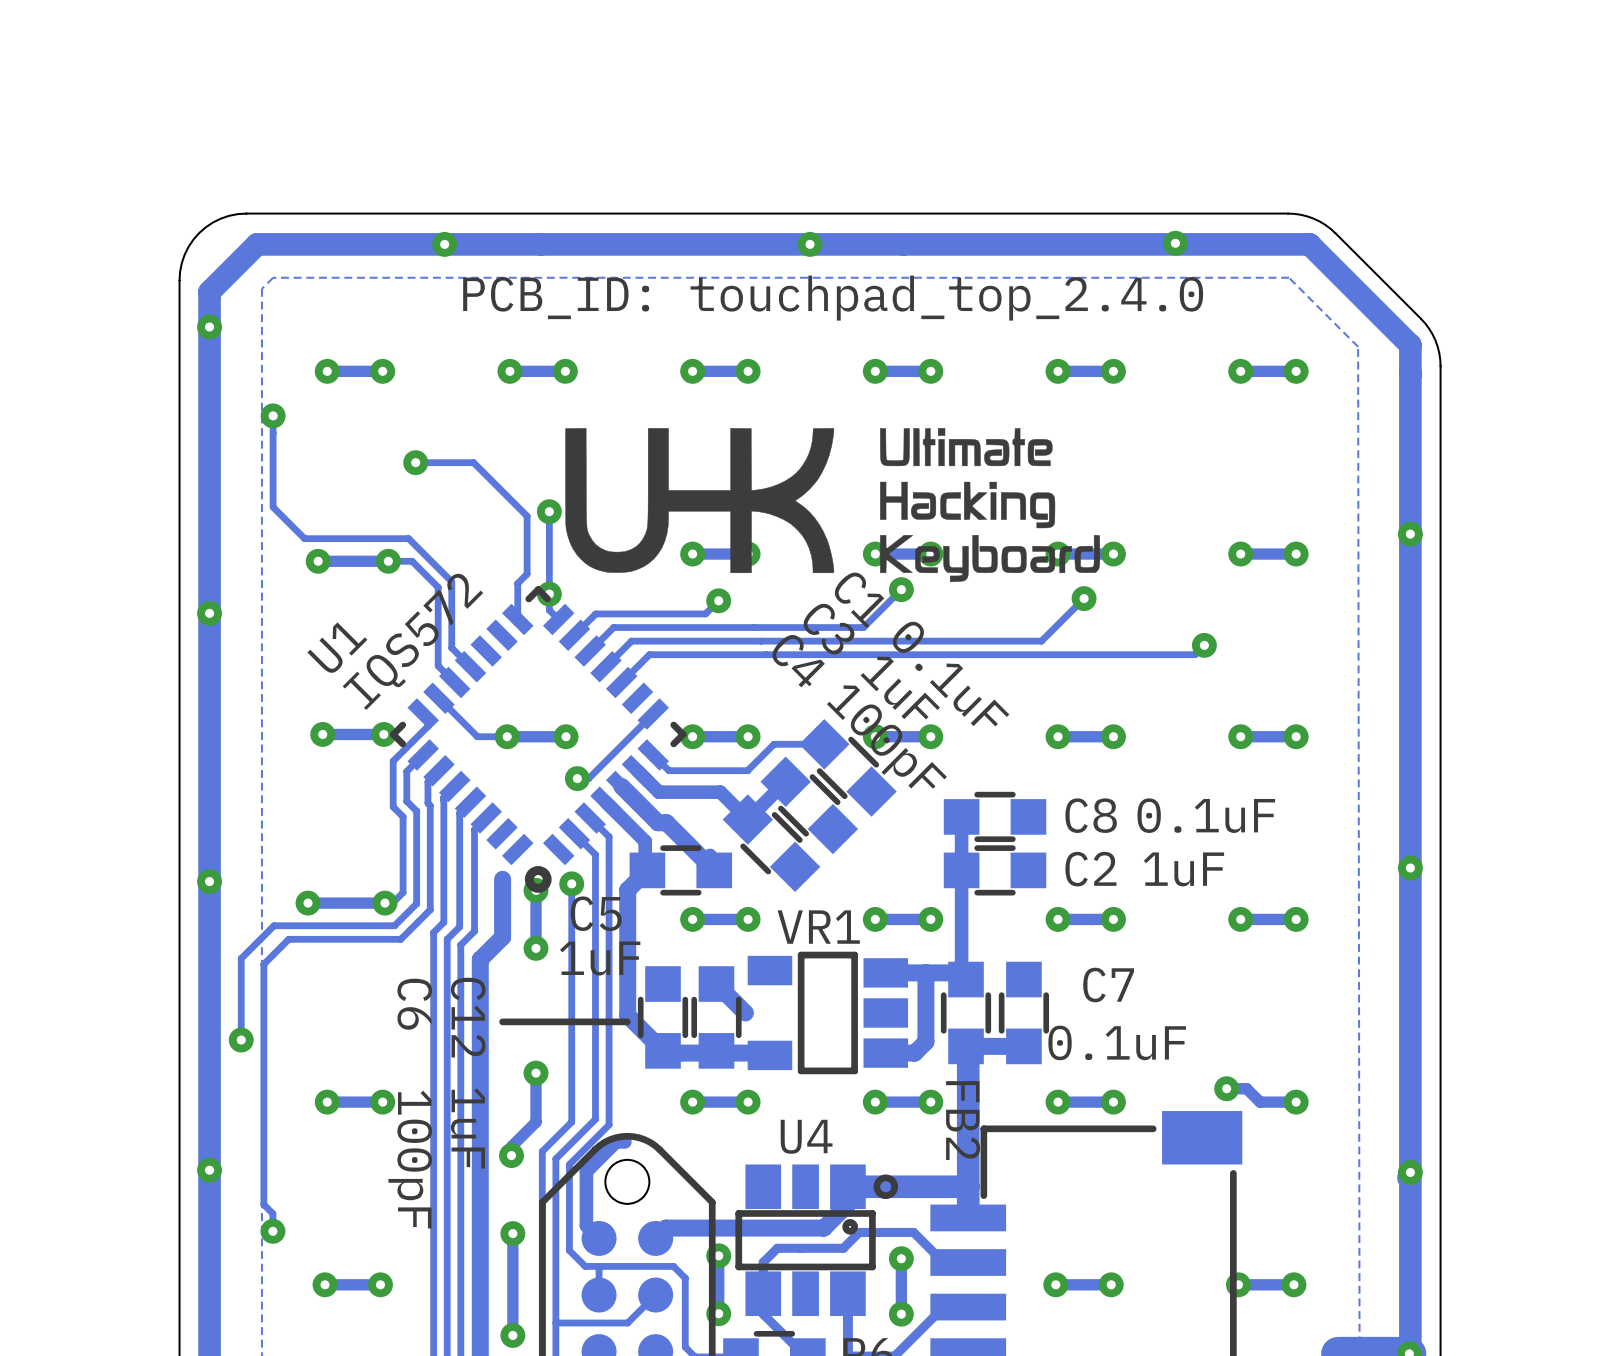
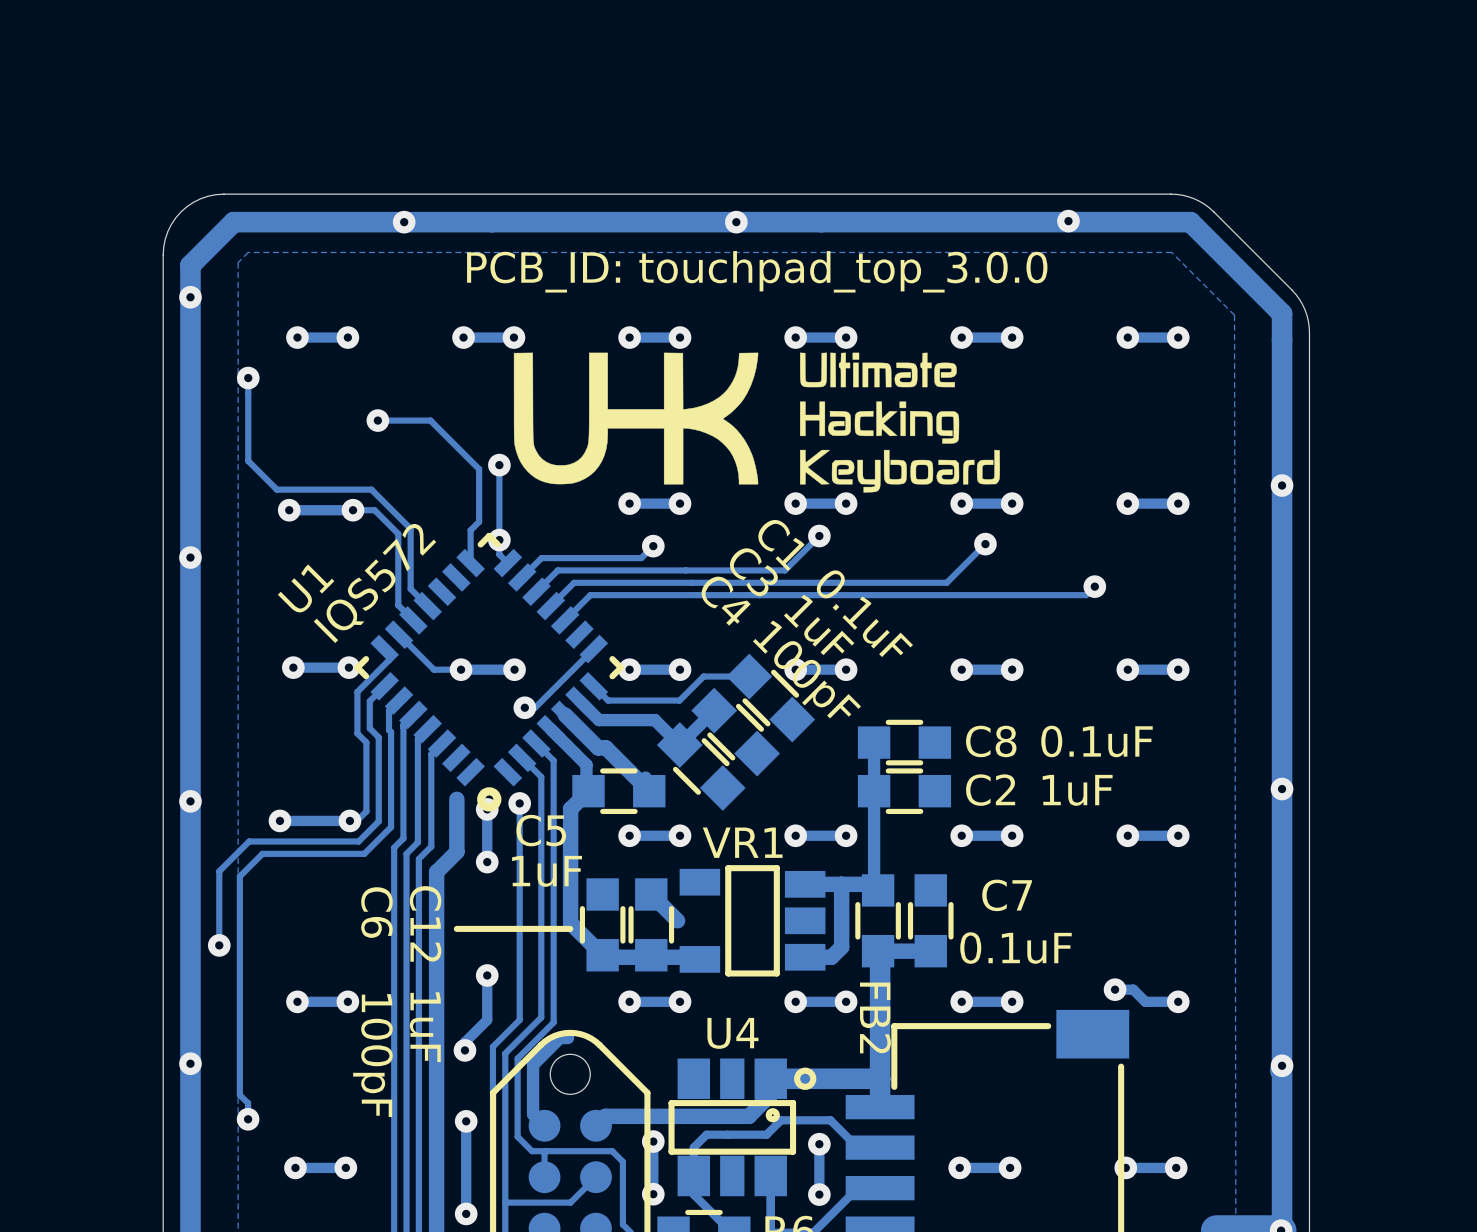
text: PCB_ID: touchpad_top_2.4.0 (833, 298) -> PCB_ID: touchpad_top_3.0.0 (757, 271)
drawing position: (832, 505) -> (756, 422)

